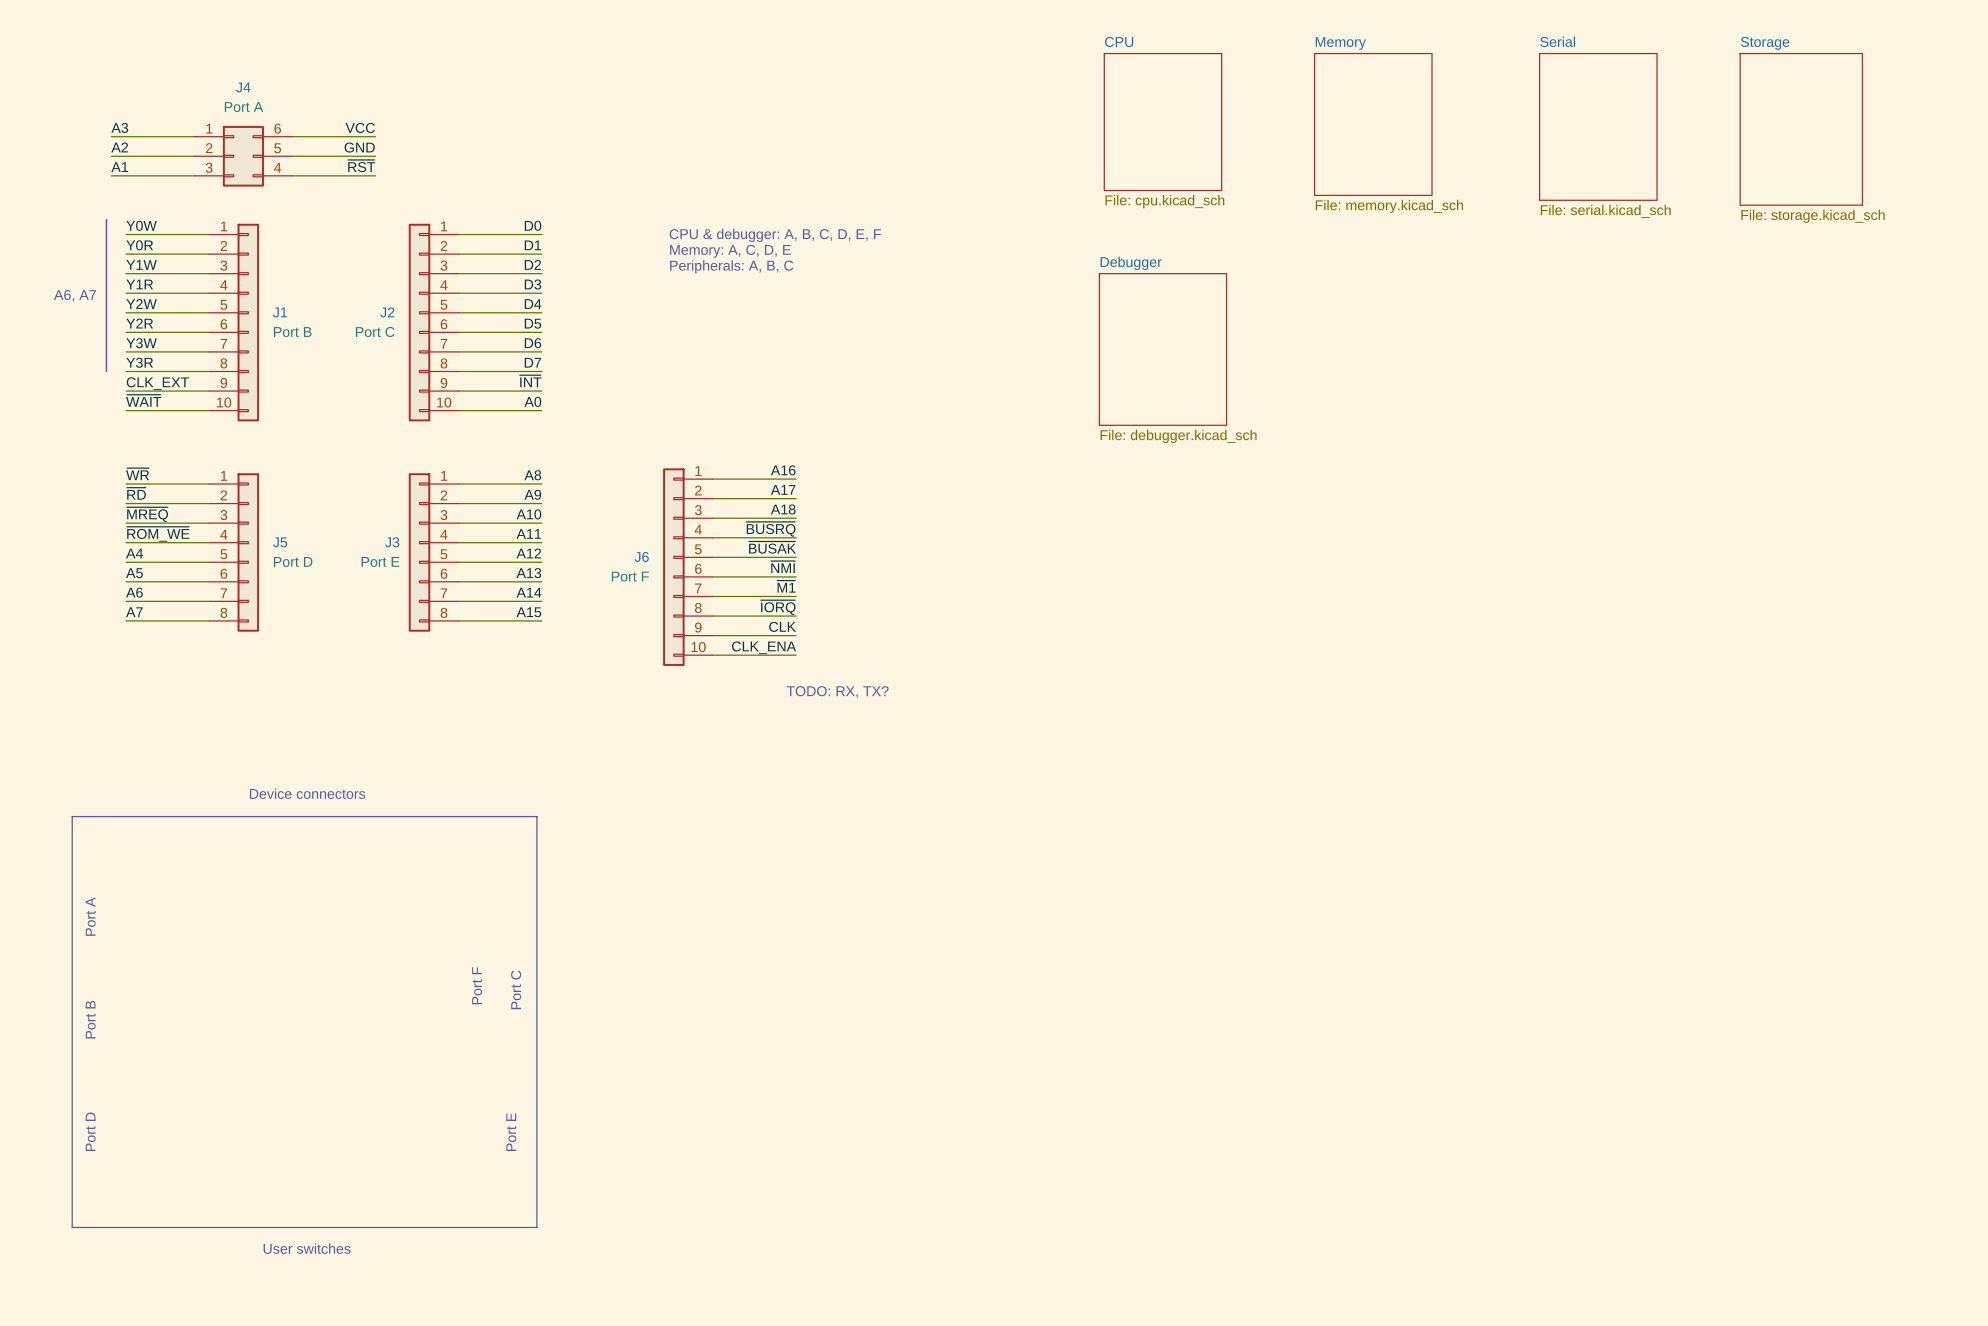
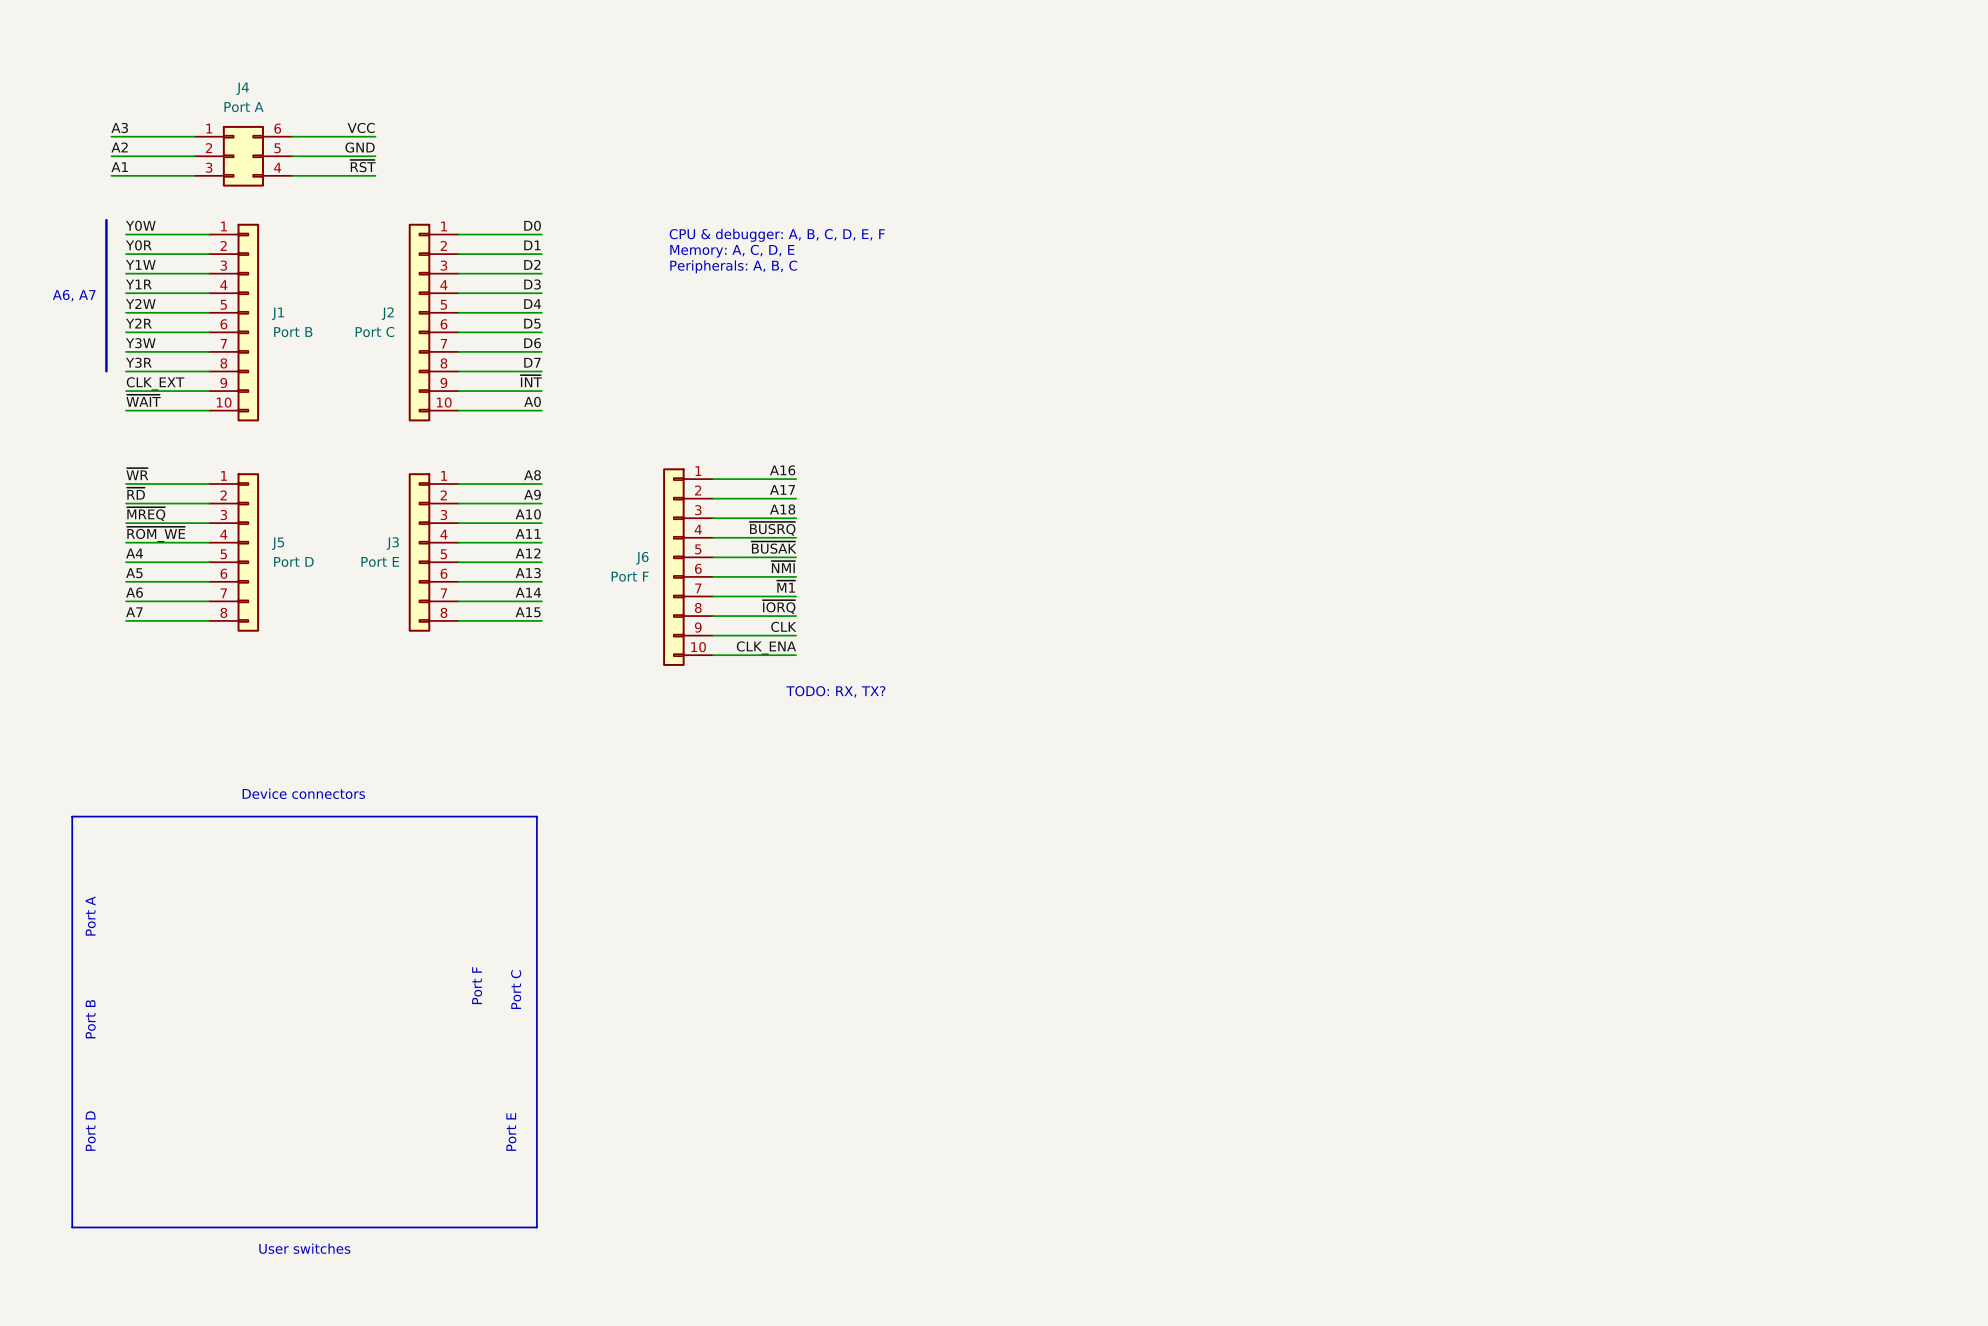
sheet CPU: File: cpu.kicad_sch (1162, 122) -> none
sheet Memory: File: memory.kicad_sch (1373, 124) -> none
sheet Serial: File: serial.kicad_sch (1598, 126) -> none
sheet Storage: File: storage.kicad_sch (1801, 129) -> none
sheet Debugger: File: debugger.kicad_sch (1162, 349) -> none

